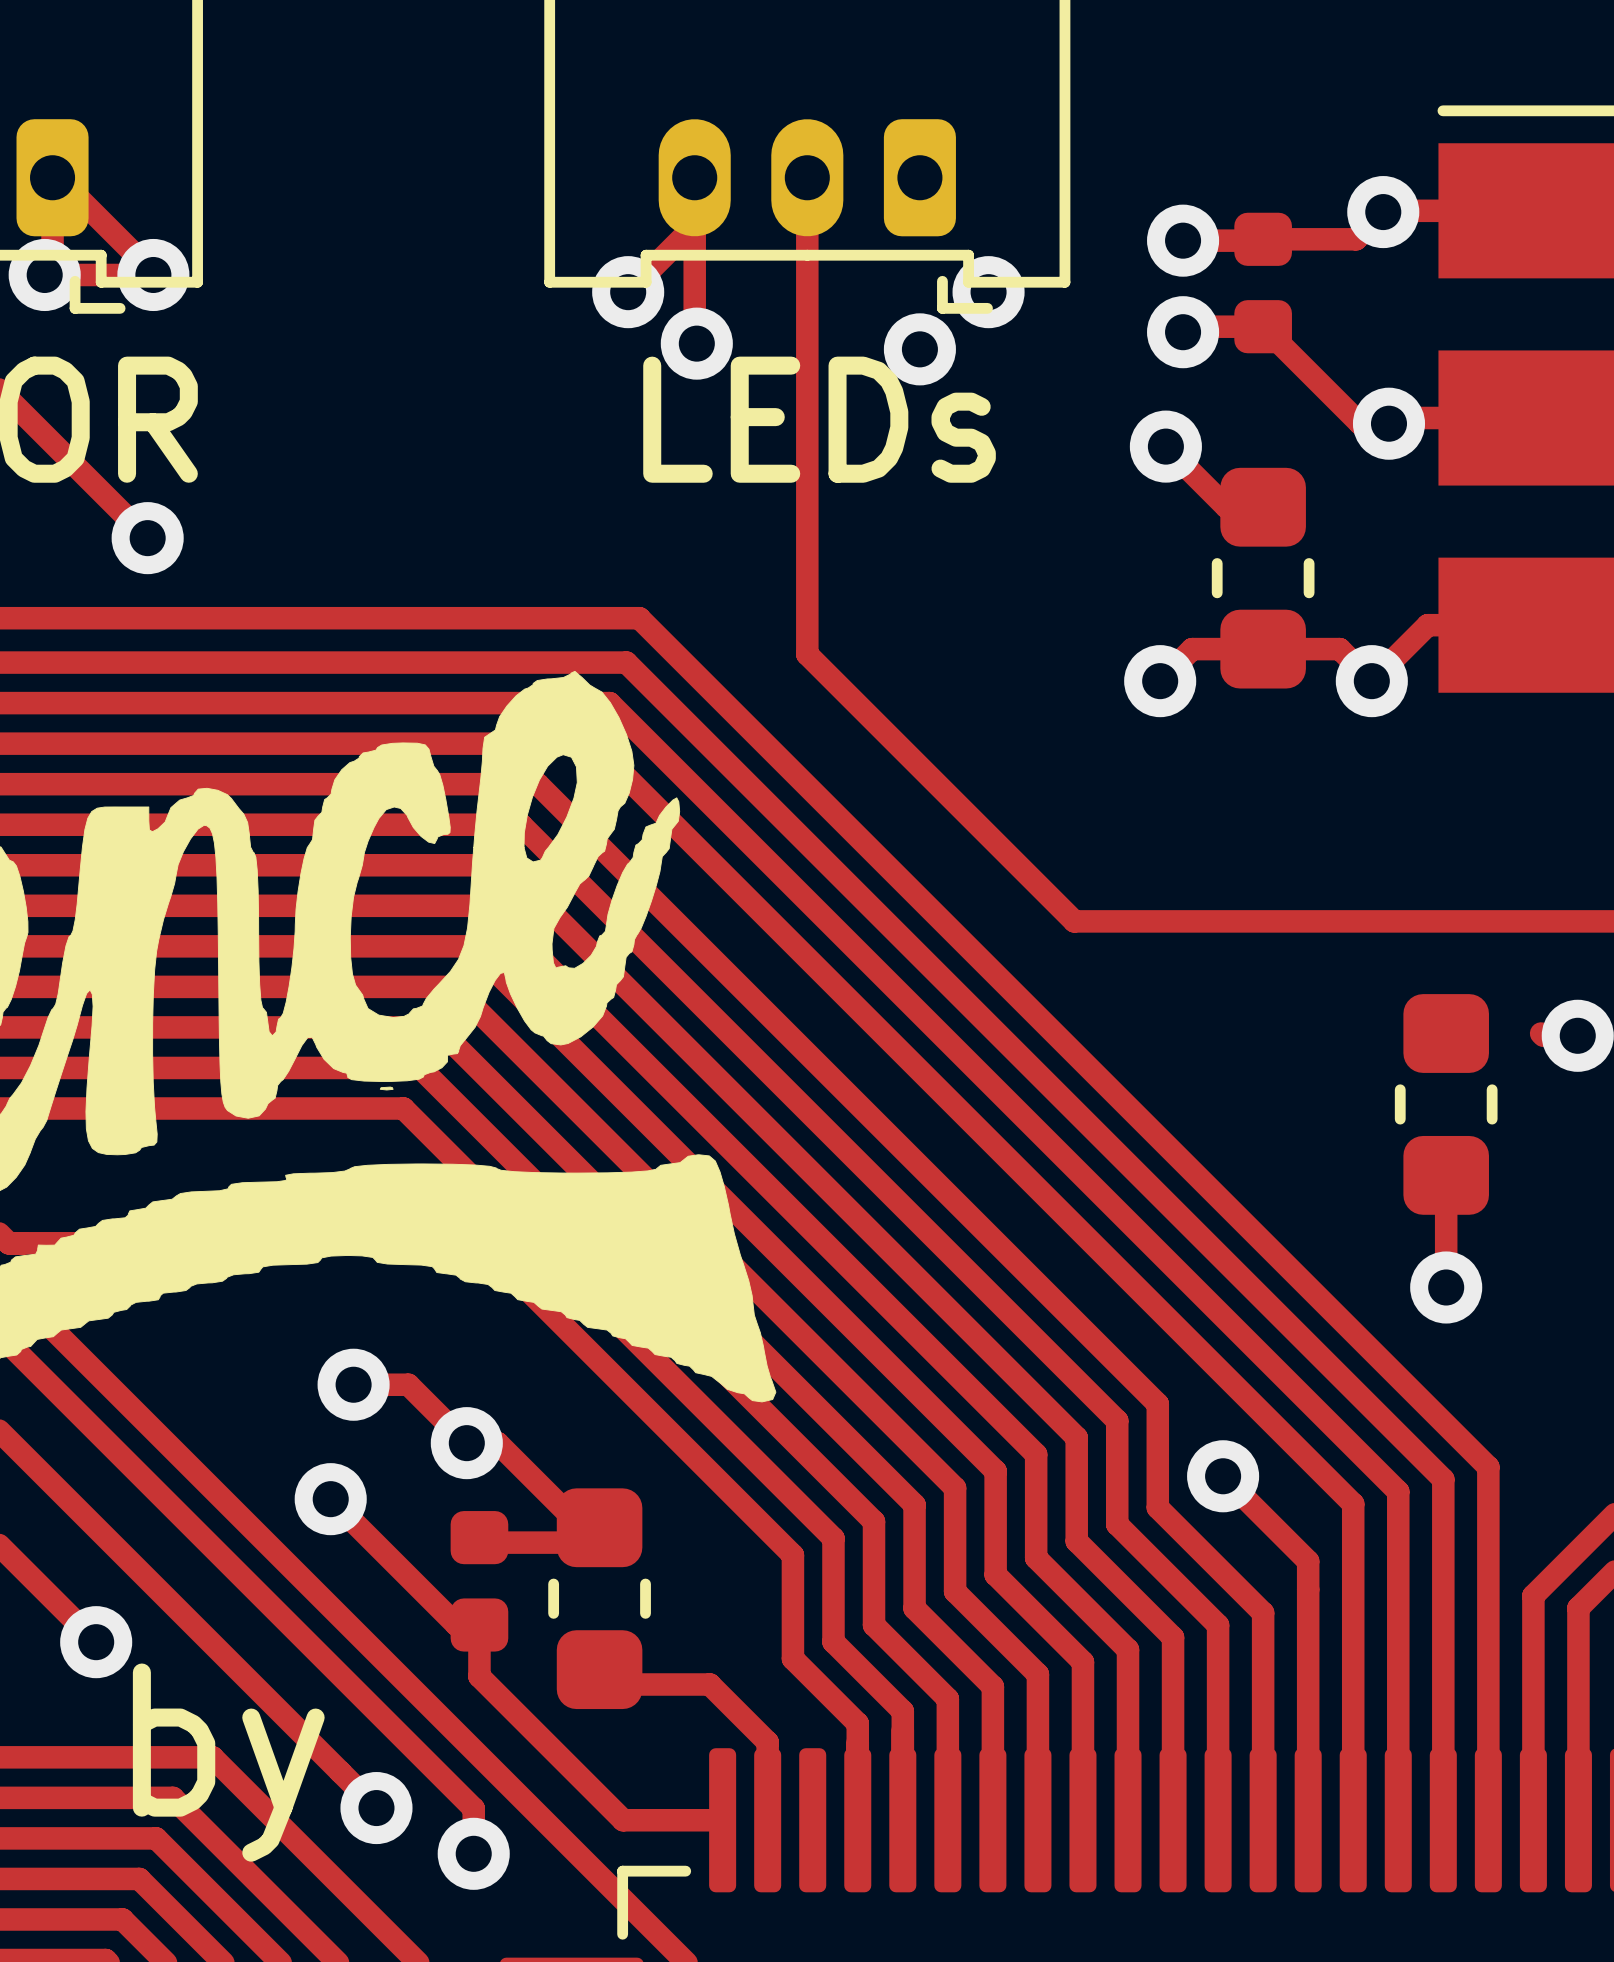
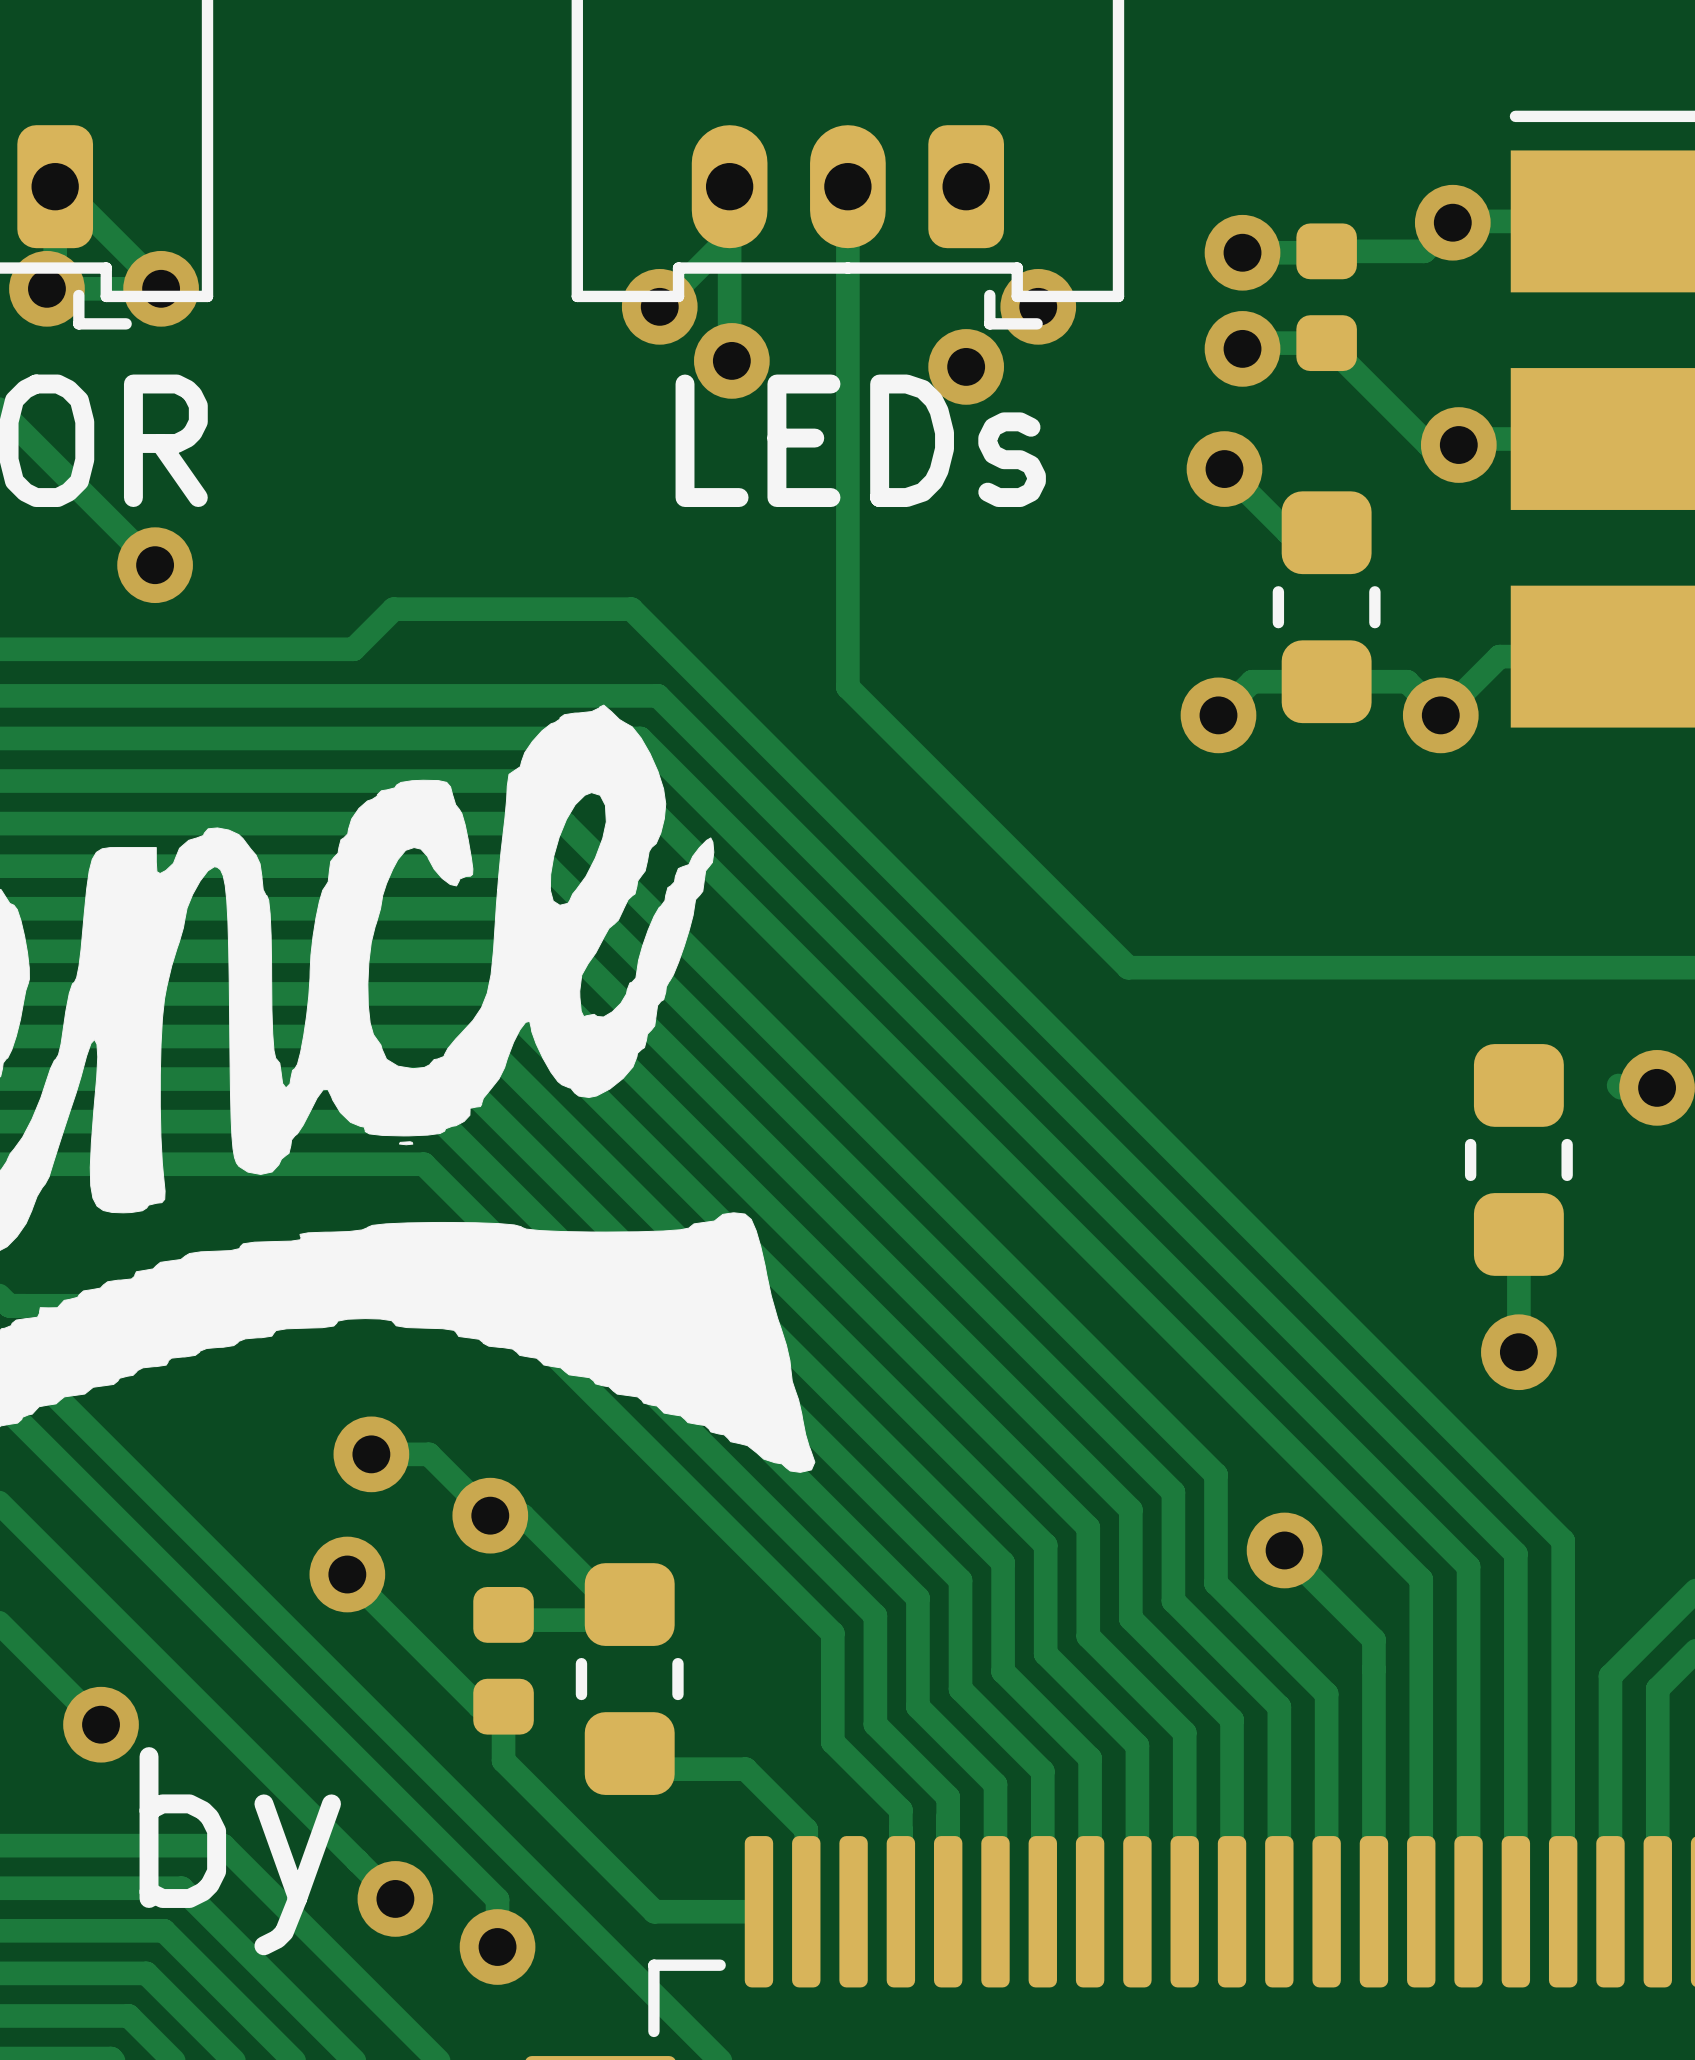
track: (336, 618) (639, 618) -> (353, 649) (393, 609) (631, 609) (671, 649)

